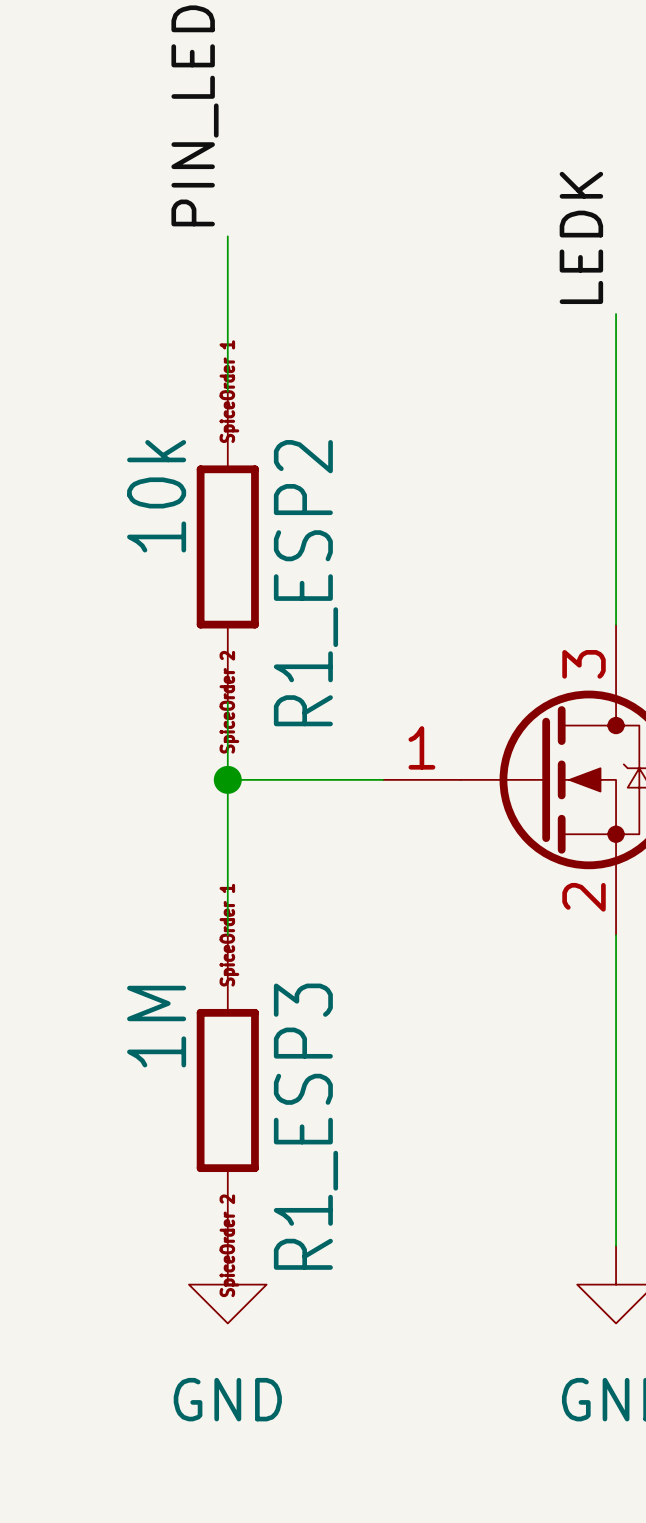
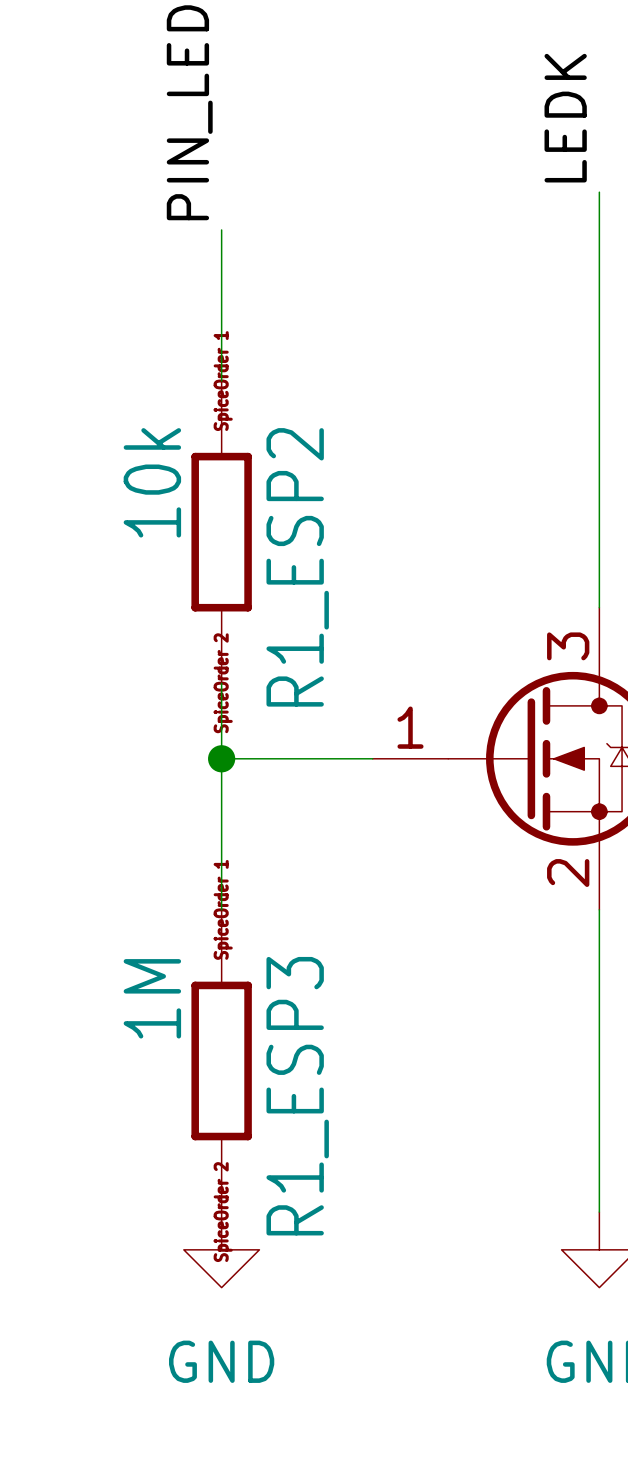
wire: none -> (599, 192) (599, 305)
label position: LEDK (581, 237) -> LEDK (565, 118)

